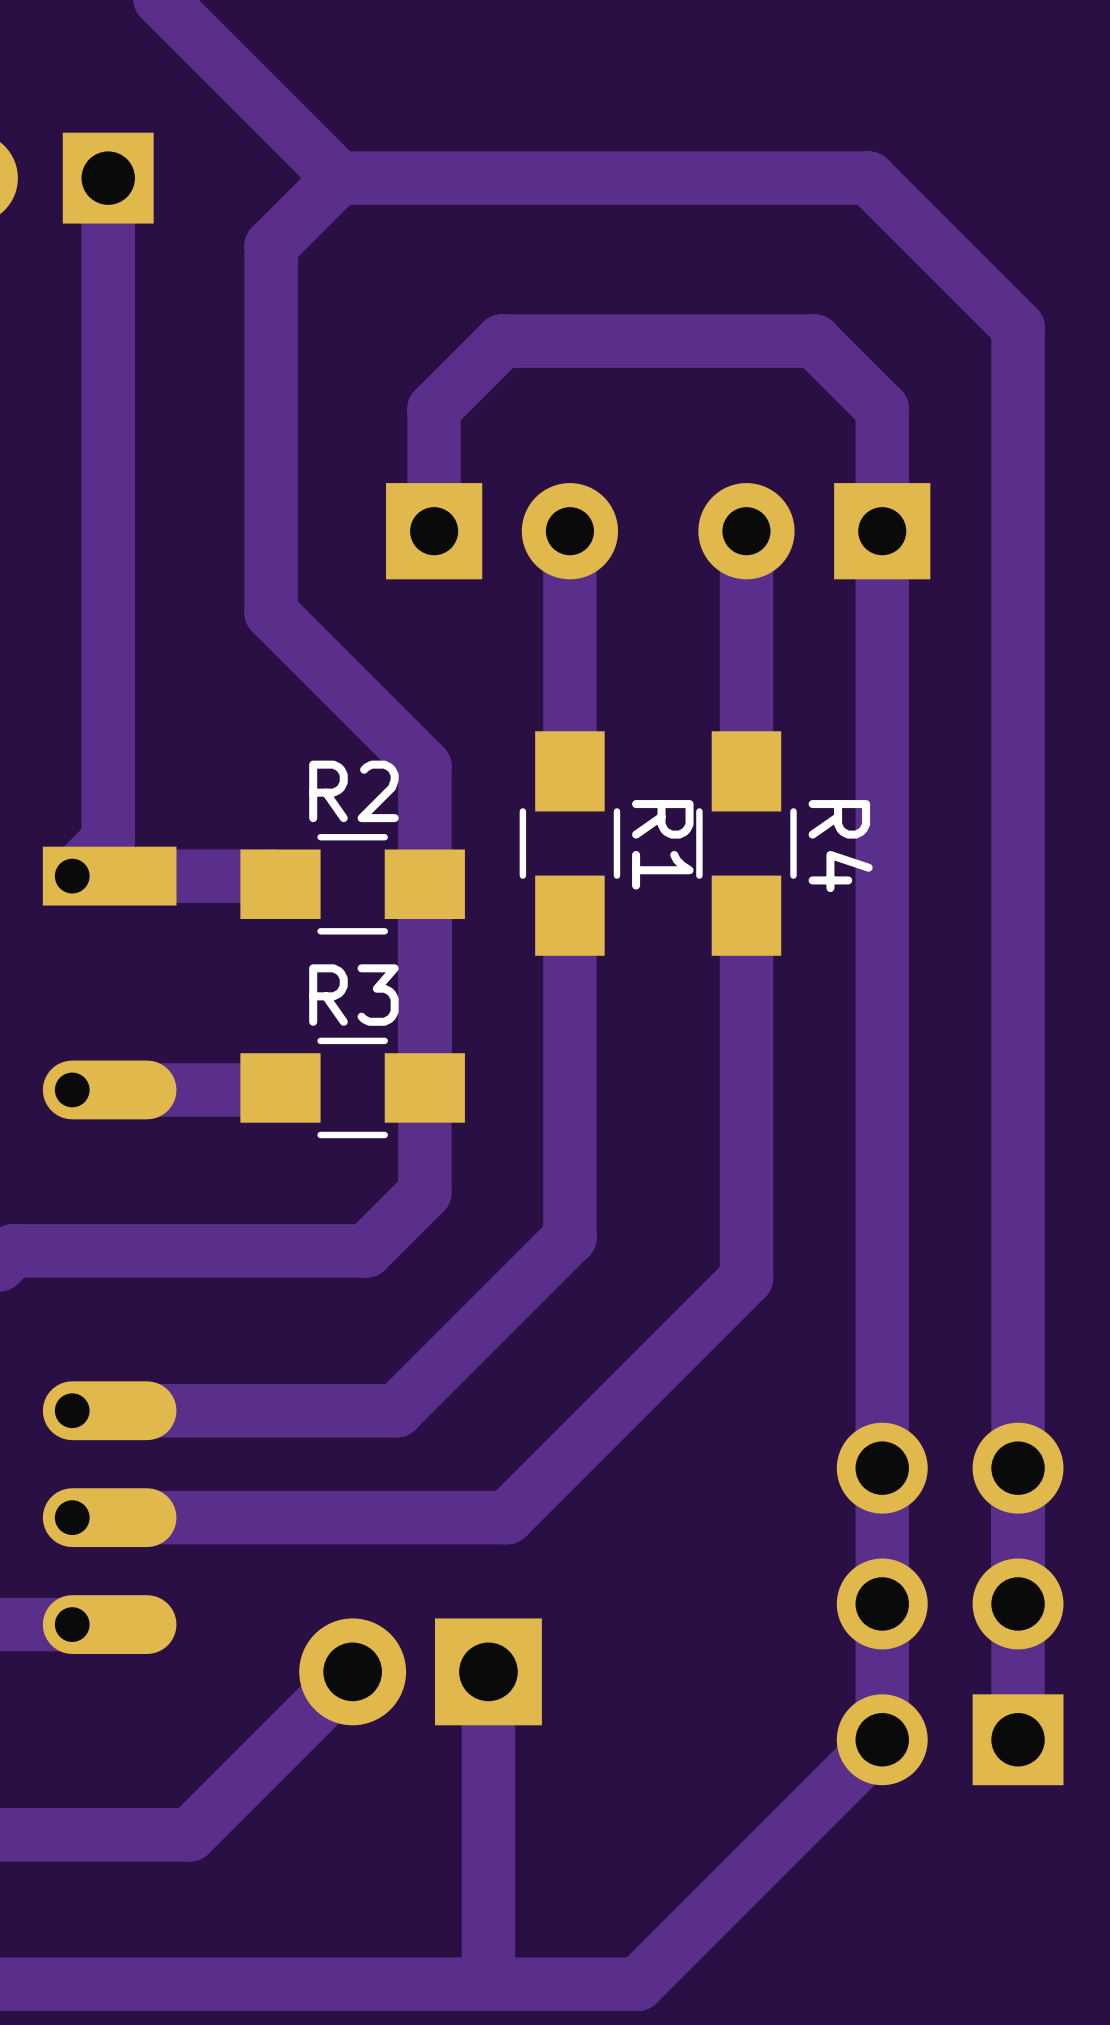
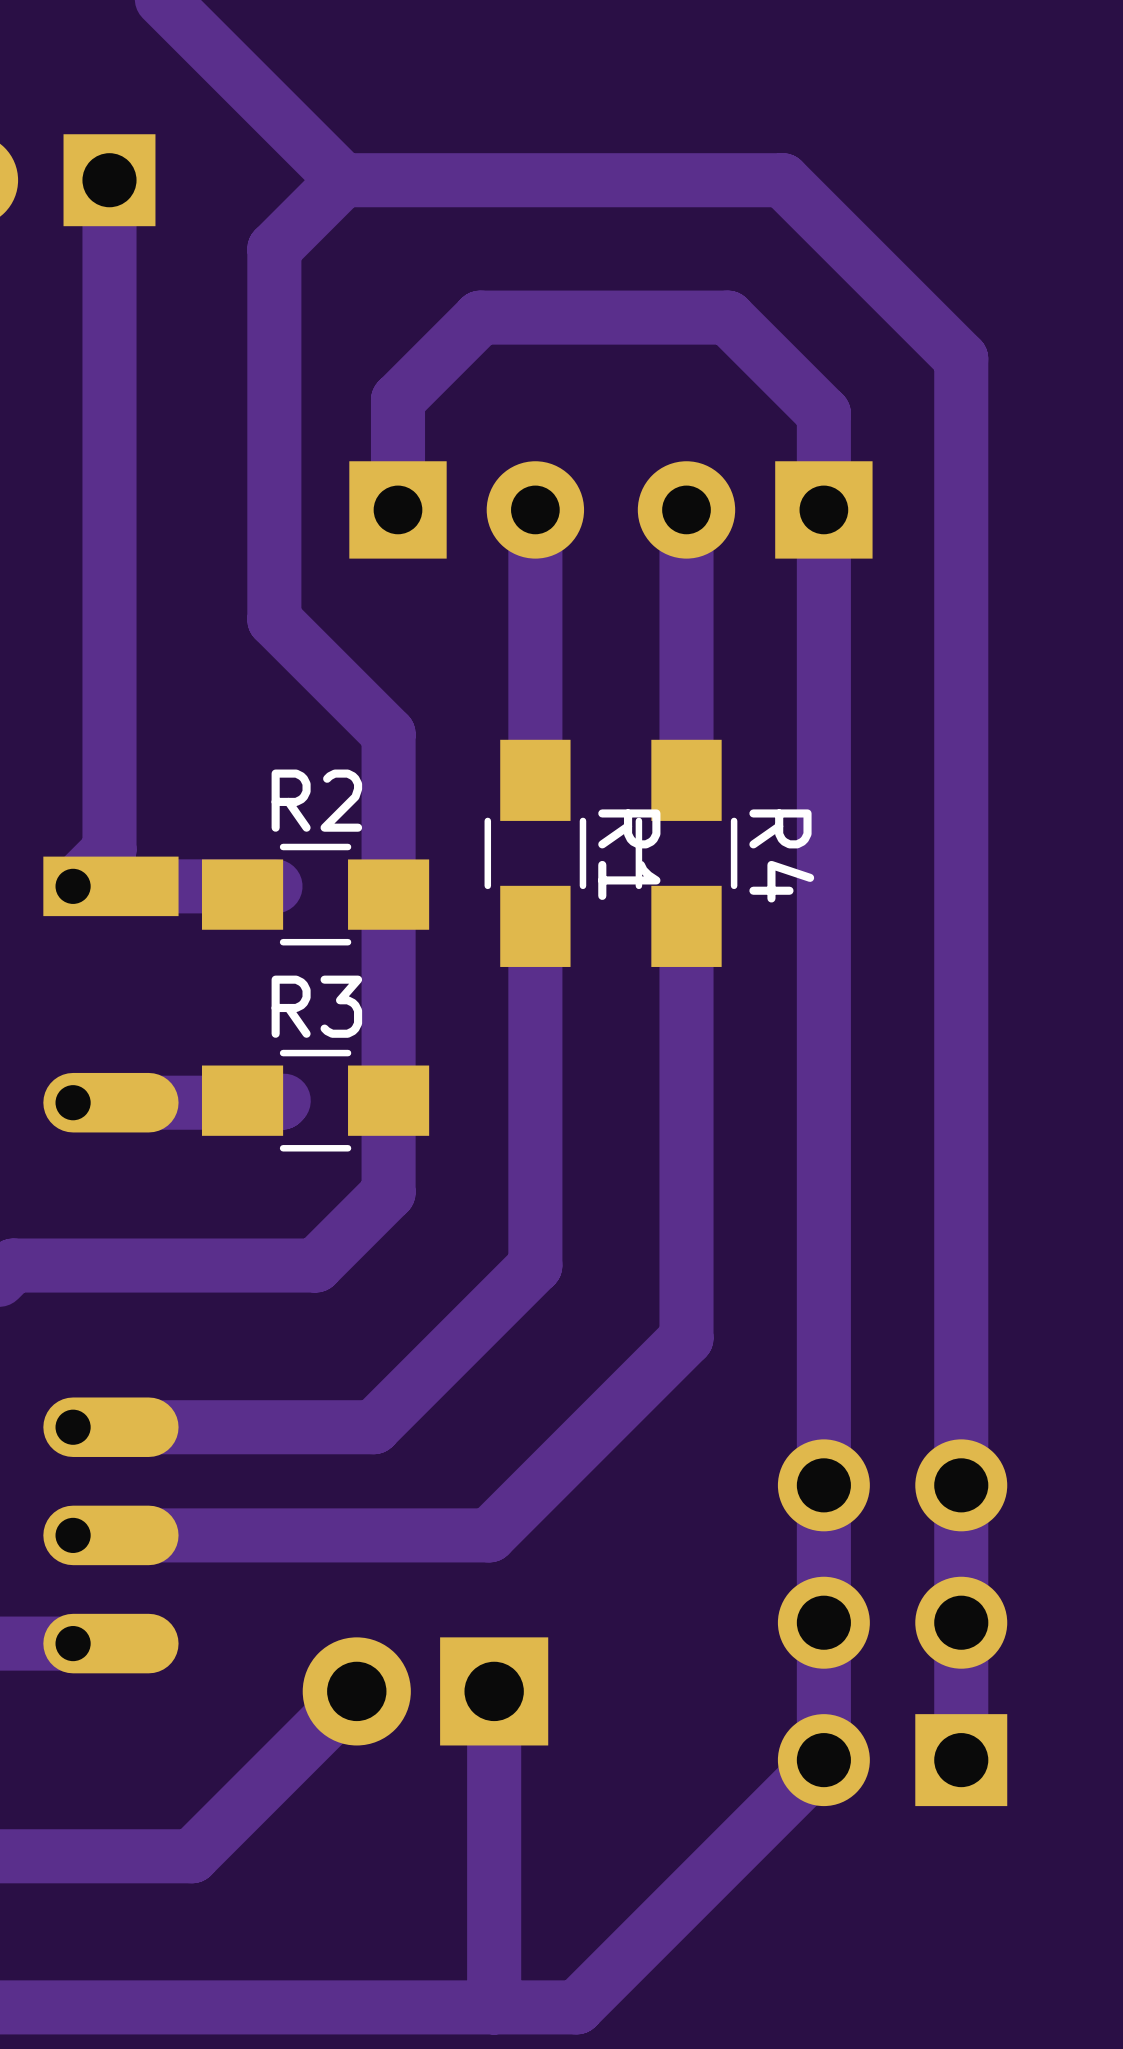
track: (773, 178) (868, 178) (1018, 327) (1018, 1739) -> (782, 180) (961, 358) (961, 1760)
track: none -> (535, 509) (535, 780)
track: none -> (686, 509) (686, 780)
track: (434, 531) (434, 408) (502, 341) (814, 341) (882, 408) (882, 1739) (637, 1984) (569, 1984) -> (397, 509) (397, 400) (480, 317) (727, 317) (823, 413) (823, 1760) (576, 2007)
part position: (502, 531) -> (466, 509)
track: (569, 531) (569, 771) -> none
track: (746, 531) (746, 771) -> none
part position: (814, 531) -> (755, 509)
track: (384, 725) (424, 766) (424, 1192) (366, 1250) (311, 1250) -> (388, 734) (388, 1192) (315, 1265)
R1 position: (569, 843) -> (535, 853)
R4 position: (746, 843) -> (686, 853)
R2 position: (352, 884) -> (315, 894)
track: (569, 915) (569, 1237) (396, 1410) (369, 1410) -> (535, 926) (535, 1265) (373, 1427)
track: (746, 915) (746, 1278) (506, 1517) (483, 1517) -> (686, 926) (686, 1338) (489, 1535)
R3 position: (352, 1087) -> (315, 1100)
part position: (950, 1603) -> (892, 1622)

